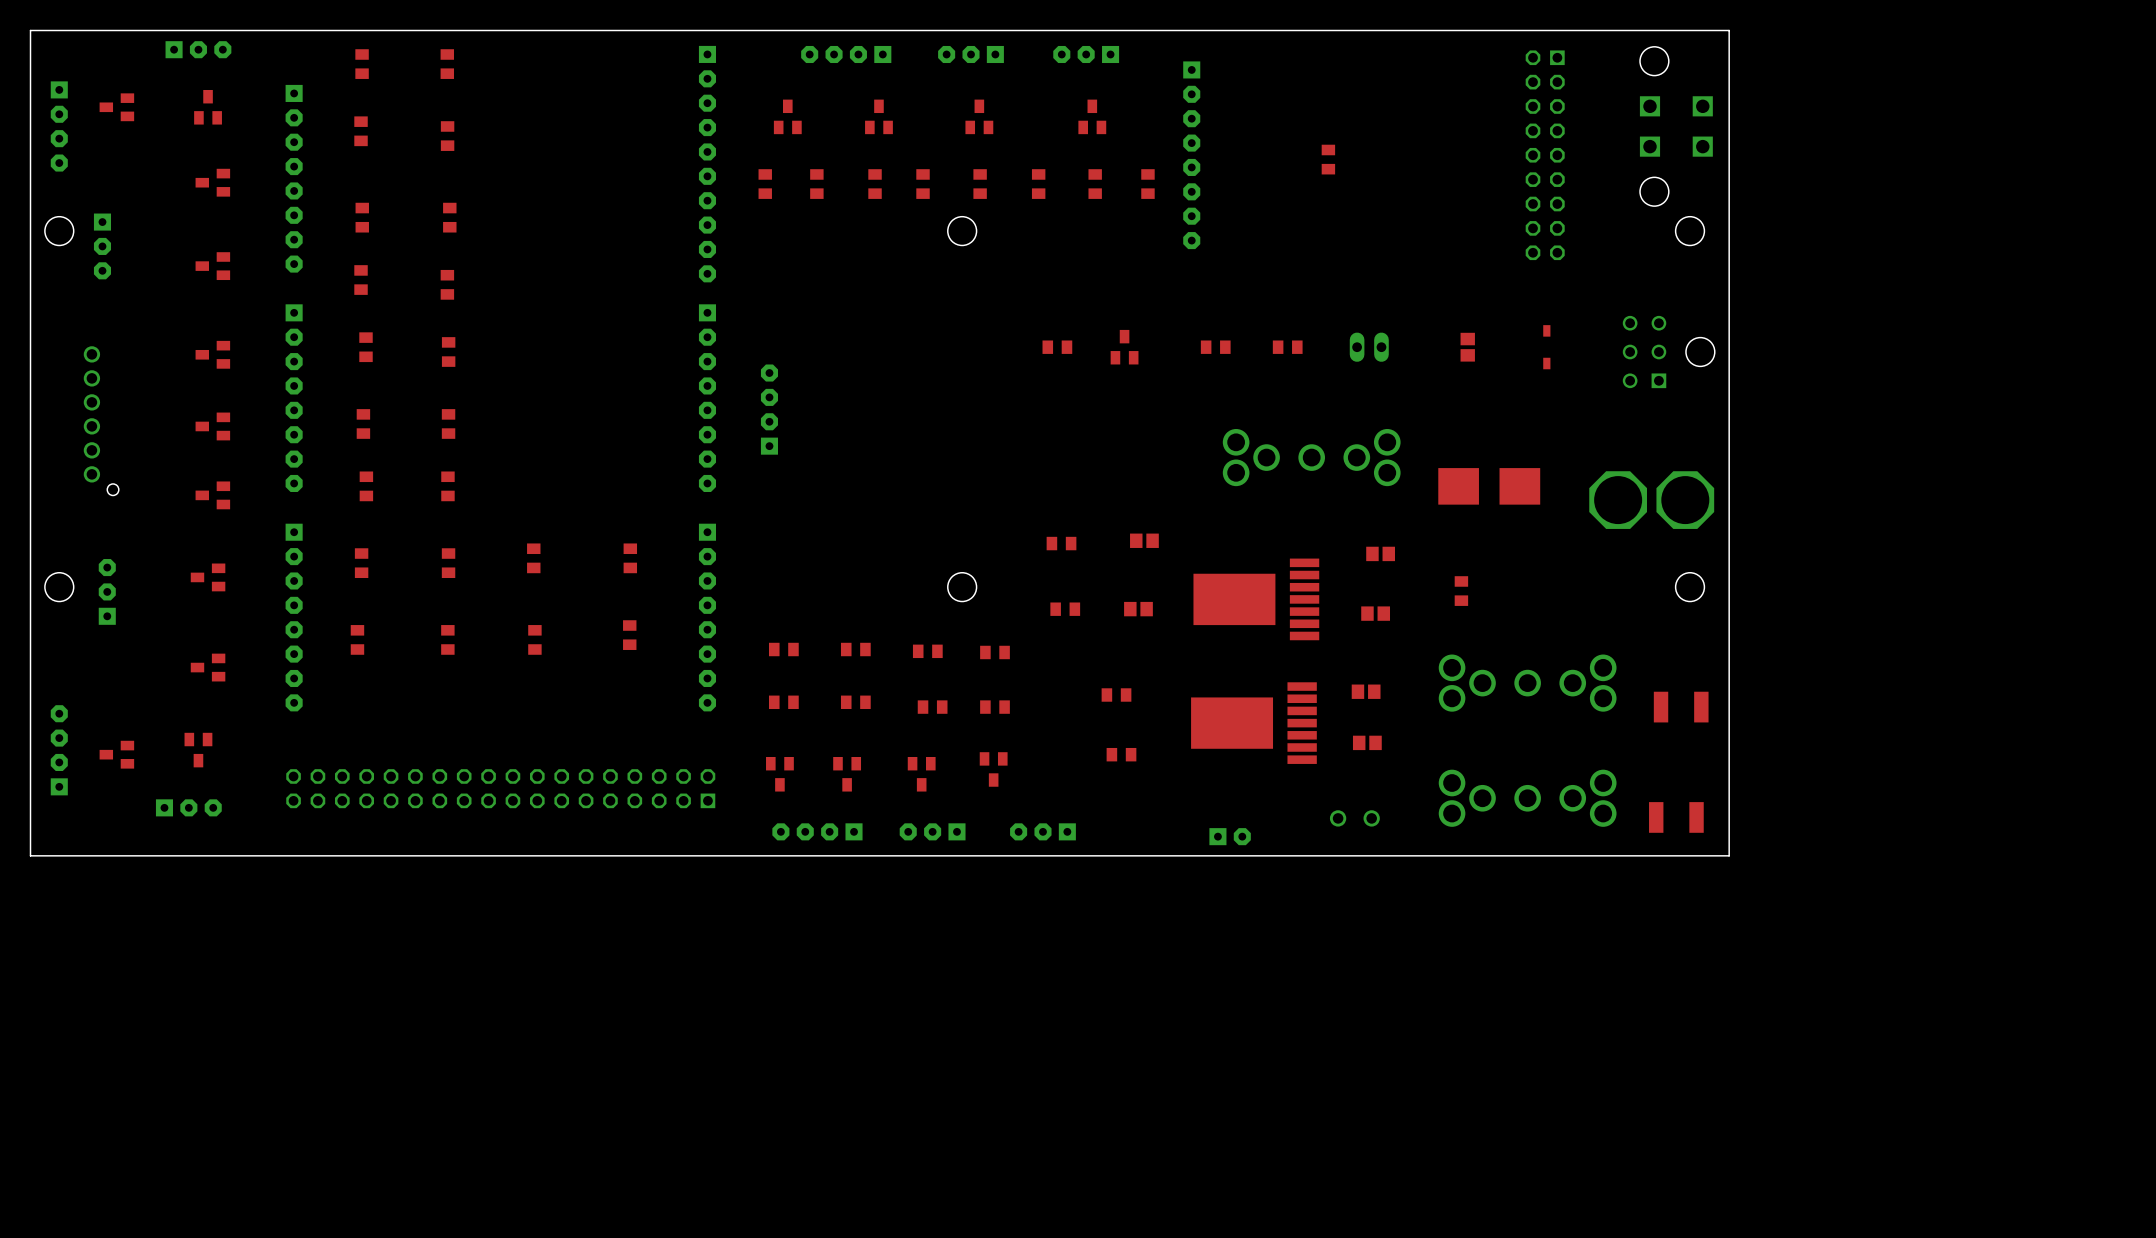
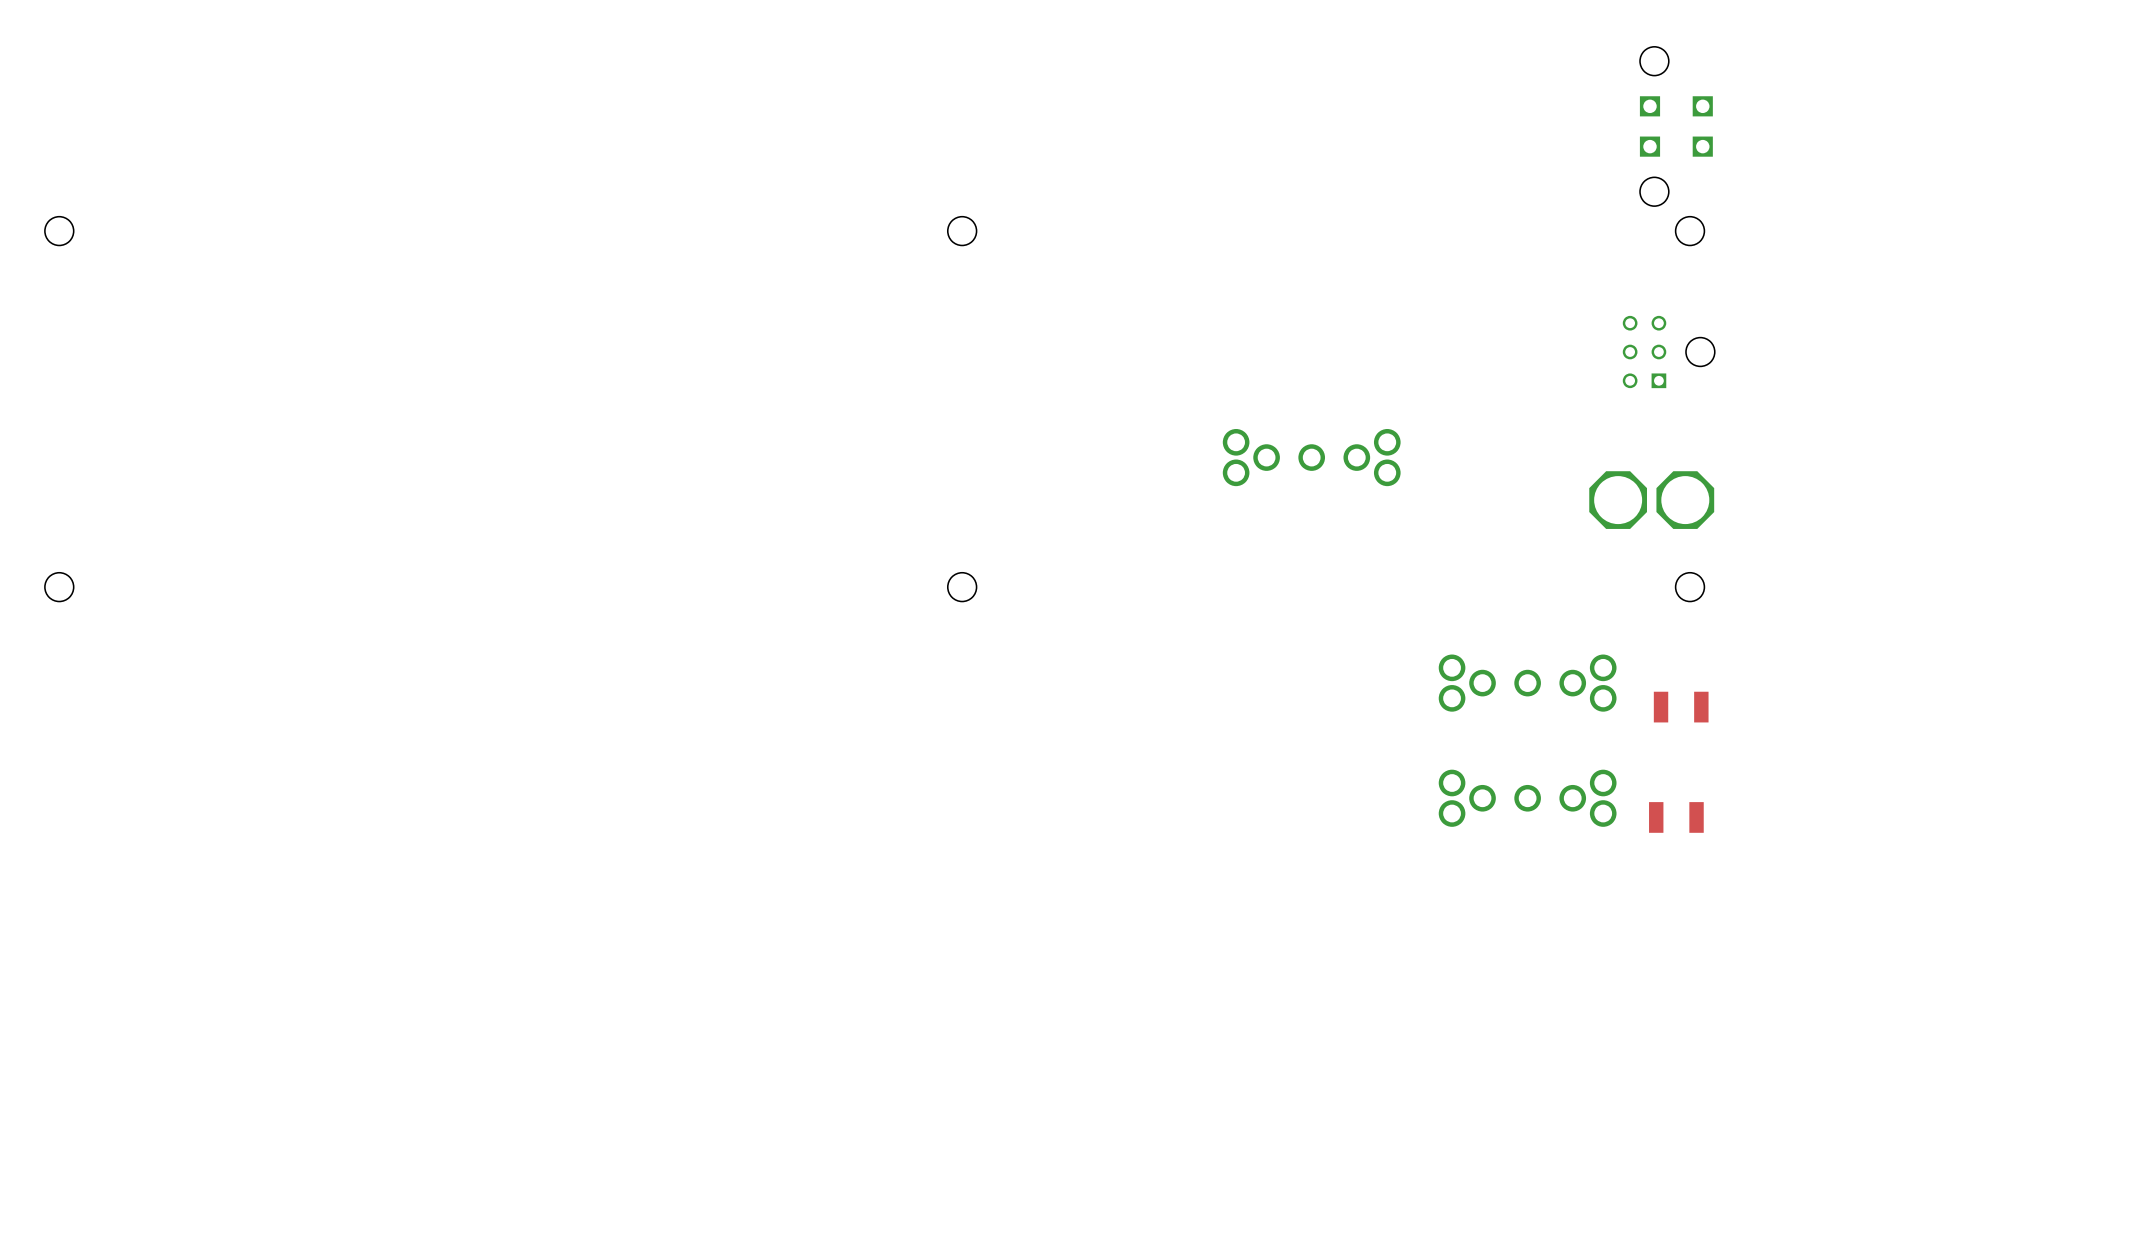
board edge: (1729, 30) (30, 30) (30, 855) (1729, 855) (1729, 30) -> none
part: (198, 49) -> none
part: (846, 54) -> none
part: (971, 54) -> none
part: (1086, 54) -> none
part: (362, 64) -> none
part: (447, 64) -> none
part: (116, 107) -> none
part: (208, 107) -> none
part: (787, 116) -> none
part: (878, 116) -> none
part: (979, 116) -> none
part: (1092, 116) -> none
part: (59, 126) -> none
part: (361, 131) -> none
part: (447, 136) -> none
part: (1191, 155) -> none
part: (1545, 155) -> none
part: (1328, 159) -> none
part: (707, 164) -> none
part: (294, 178) -> none
part: (212, 182) -> none
part: (765, 184) -> none
part: (816, 184) -> none
part: (875, 184) -> none
part: (923, 184) -> none
part: (980, 184) -> none
part: (1038, 184) -> none
part: (1095, 184) -> none
part: (1147, 184) -> none
part: (362, 217) -> none
part: (449, 217) -> none
part: (102, 246) -> none
part: (212, 266) -> none
part: (361, 280) -> none
part: (447, 284) -> none
part: (366, 347) -> none
part: (1057, 347) -> none
part: (1124, 347) -> none
part: (1215, 347) -> none
part: (1287, 347) -> none
part: (1369, 347) -> none
part: (1467, 347) -> none
part: (1546, 347) -> none
part: (448, 352) -> none
part: (212, 354) -> none
part: (294, 398) -> none
part: (707, 398) -> none
part: (769, 409) -> none
part: (101, 420) -> none
part: (363, 423) -> none
part: (448, 423) -> none
part: (212, 426) -> none
part: (366, 486) -> none
part: (447, 486) -> none
part: (1489, 486) -> none
part: (212, 495) -> none
part: (1144, 540) -> none
part: (1061, 543) -> none
part: (1380, 553) -> none
part: (533, 558) -> none
part: (630, 558) -> none
part: (361, 563) -> none
part: (448, 563) -> none
part: (208, 577) -> none
part: (107, 591) -> none
part: (1461, 591) -> none
part: (1256, 599) -> none
part: (1065, 609) -> none
part: (1138, 609) -> none
part: (1375, 613) -> none
part: (294, 617) -> none
part: (707, 617) -> none
part: (629, 635) -> none
part: (357, 639) -> none
part: (447, 639) -> none
part: (534, 639) -> none
part: (783, 649) -> none
part: (855, 649) -> none
part: (927, 651) -> none
part: (995, 652) -> none
part: (208, 667) -> none
part: (1366, 691) -> none
part: (1116, 694) -> none
part: (783, 702) -> none
part: (855, 702) -> none
part: (932, 707) -> none
part: (995, 707) -> none
part: (1253, 723) -> none
part: (1367, 742) -> none
part: (59, 750) -> none
part: (198, 750) -> none
part: (116, 754) -> none
part: (1121, 754) -> none
part: (993, 769) -> none
part: (779, 774) -> none
part: (847, 774) -> none
part: (921, 774) -> none
part: (500, 788) -> none
part: (188, 807) -> none
part: (1354, 818) -> none
part: (817, 831) -> none
part: (932, 831) -> none
part: (1042, 831) -> none
part: (1230, 836) -> none

